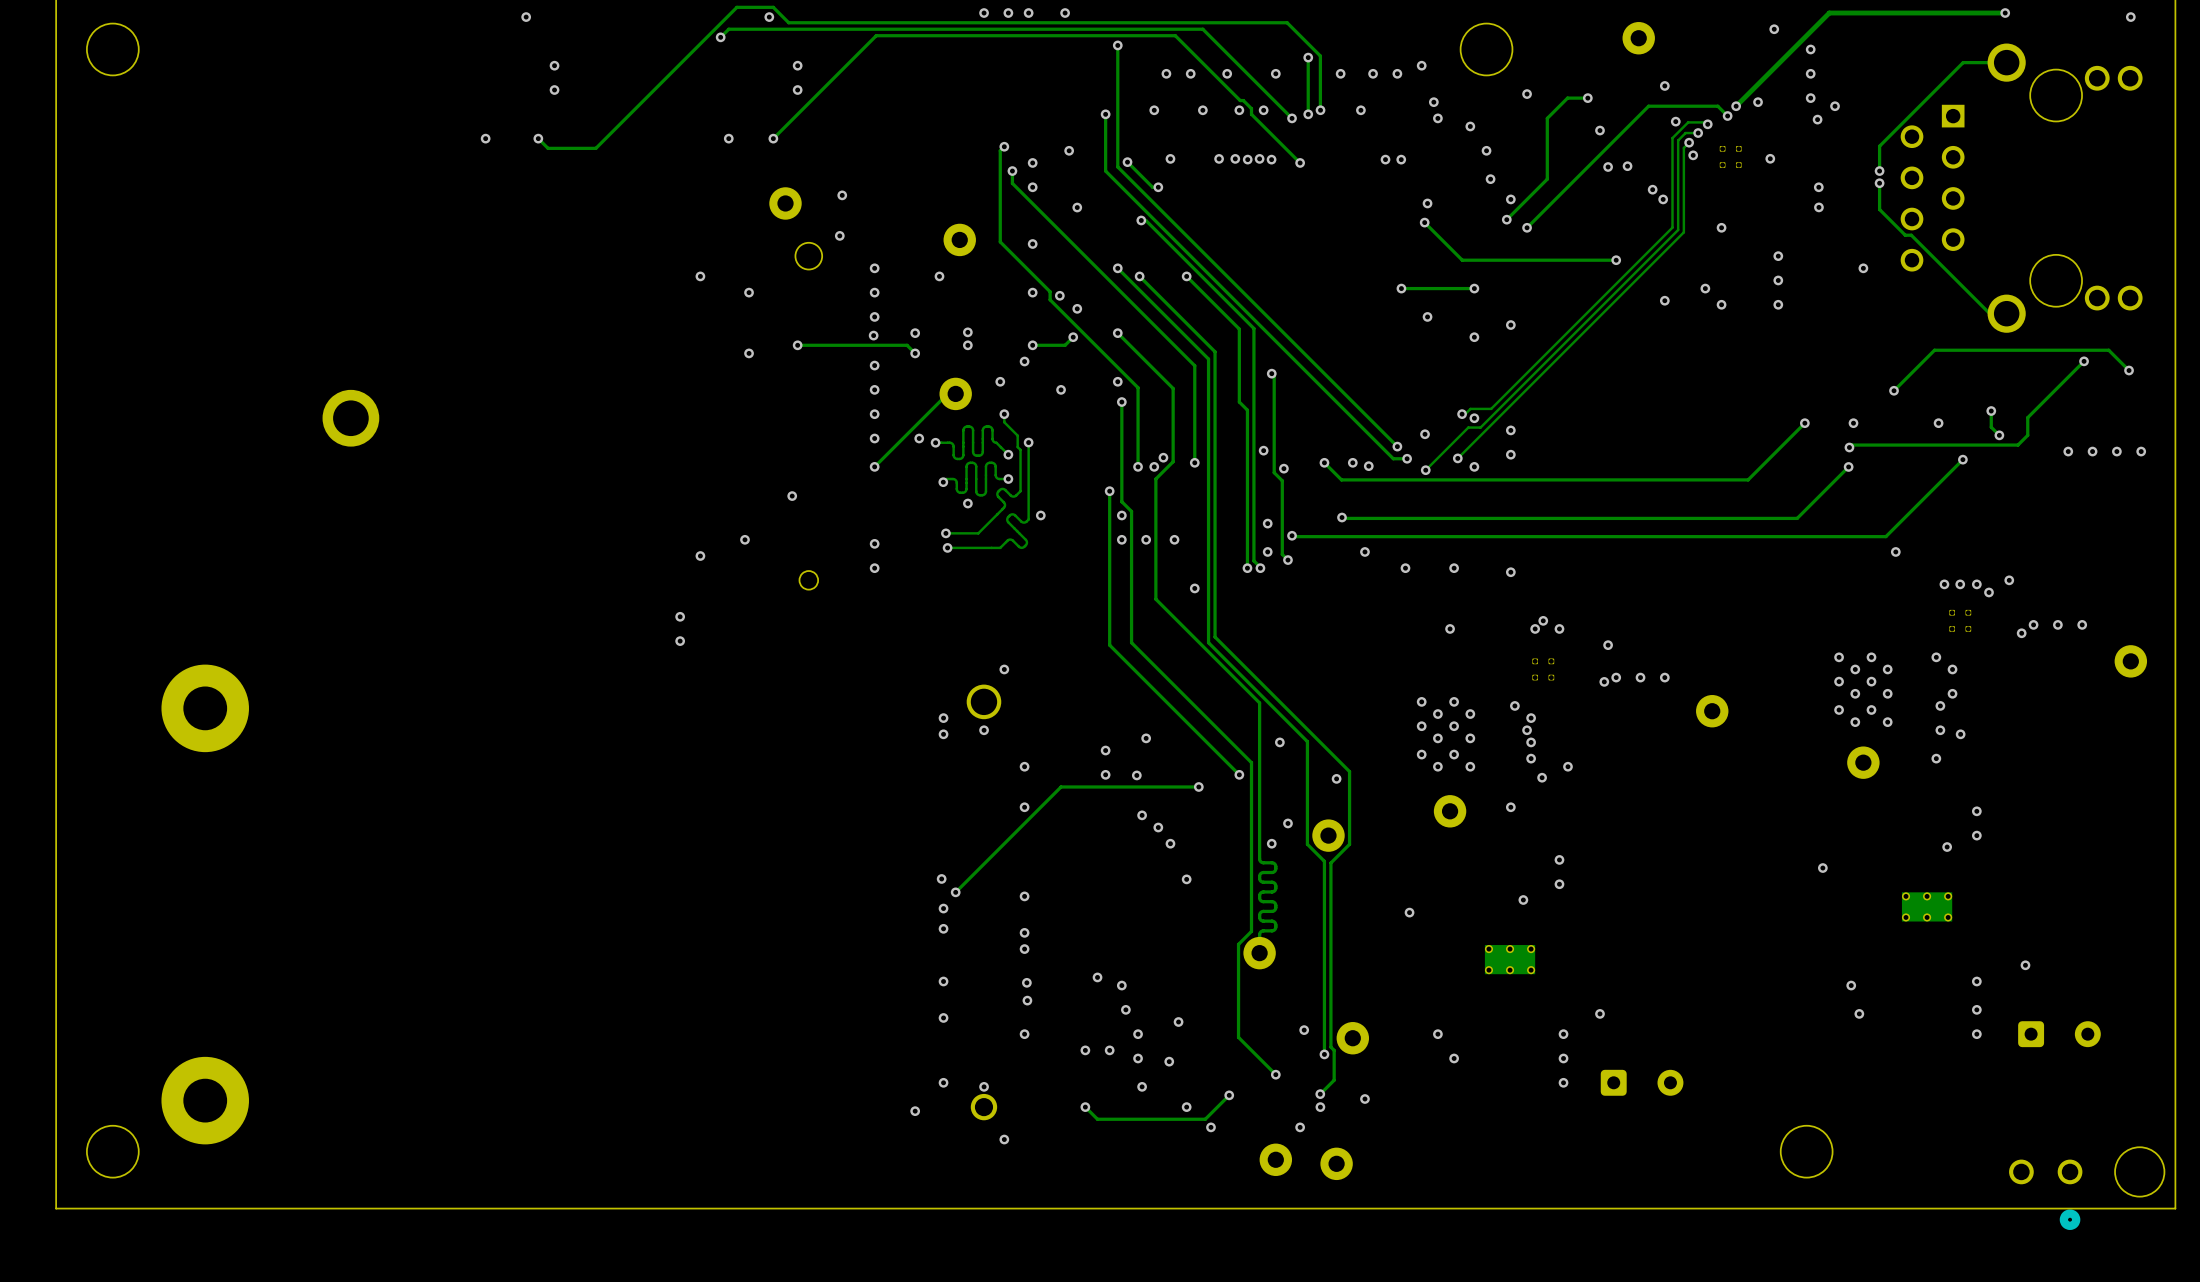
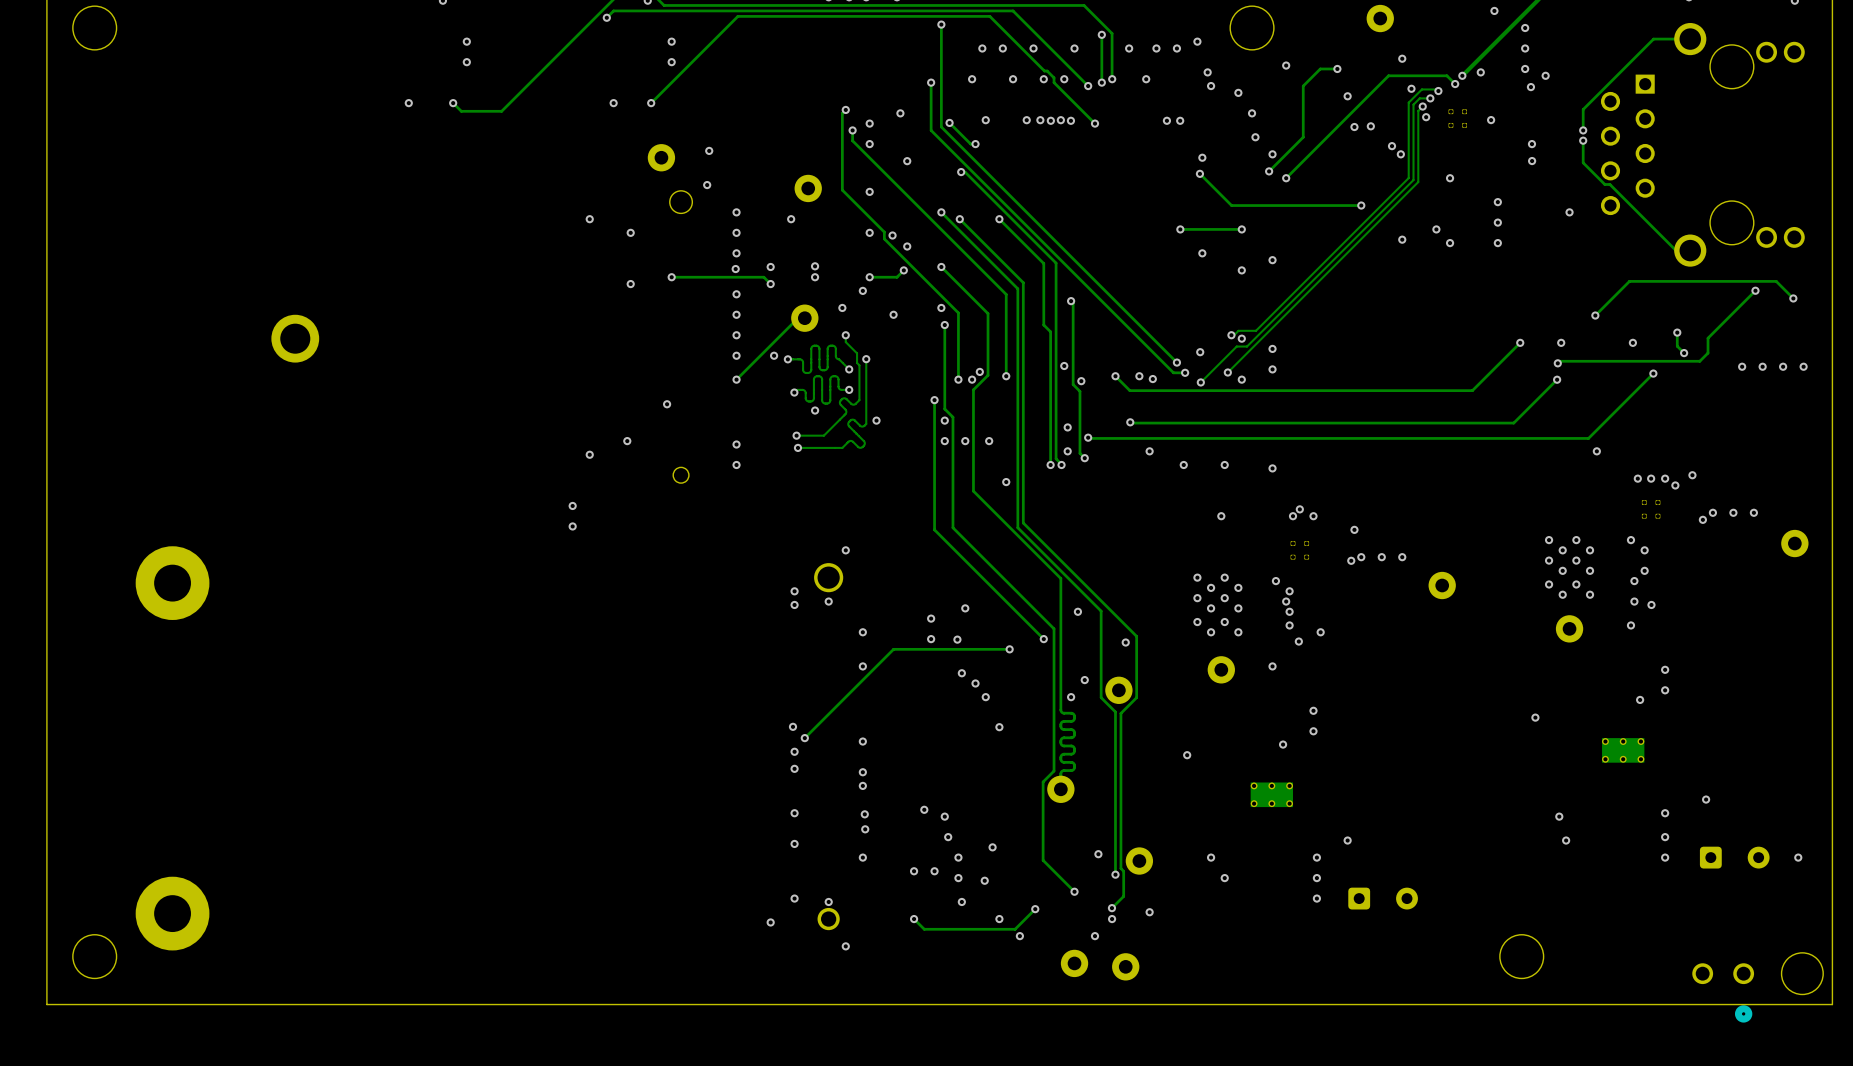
via: none -> (1798, 857)

